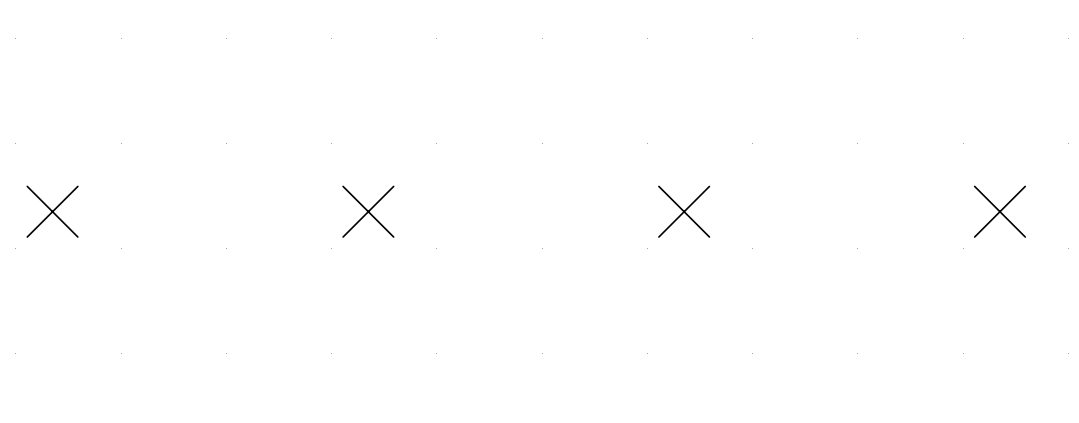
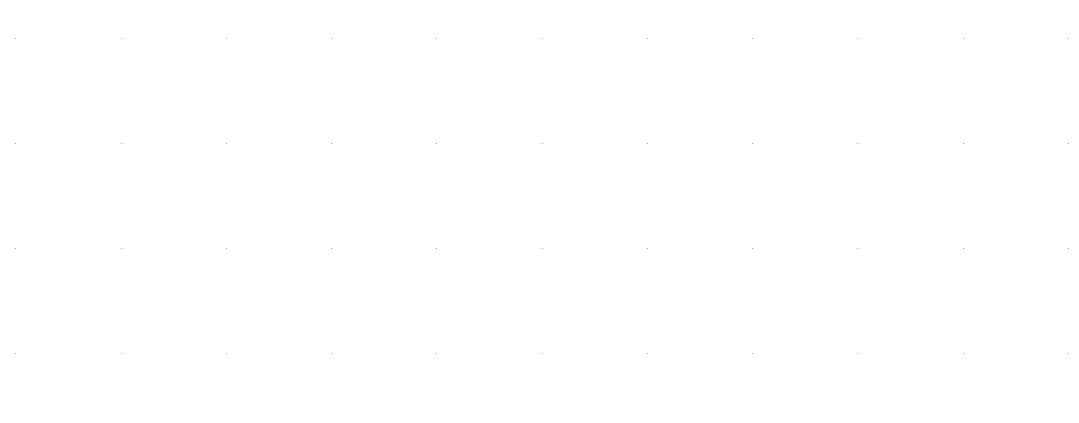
no-connect mark: (52, 211) -> none
no-connect mark: (368, 211) -> none
no-connect mark: (684, 211) -> none
no-connect mark: (999, 211) -> none

